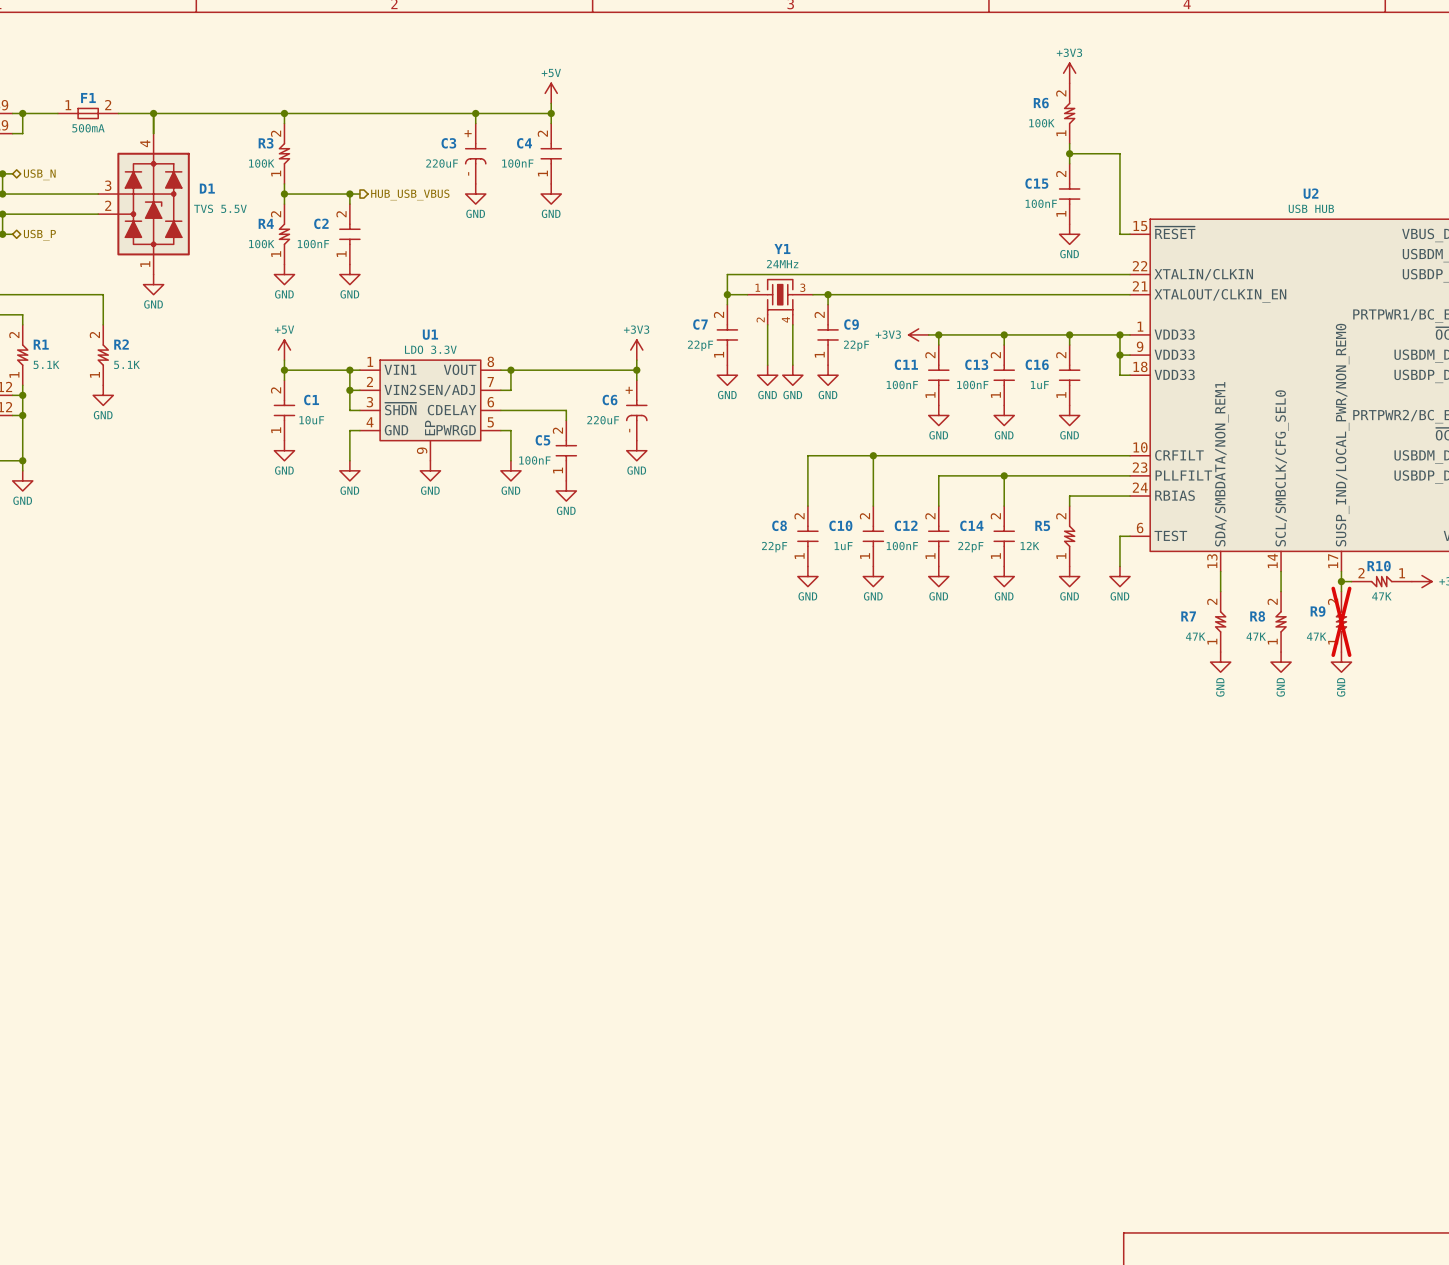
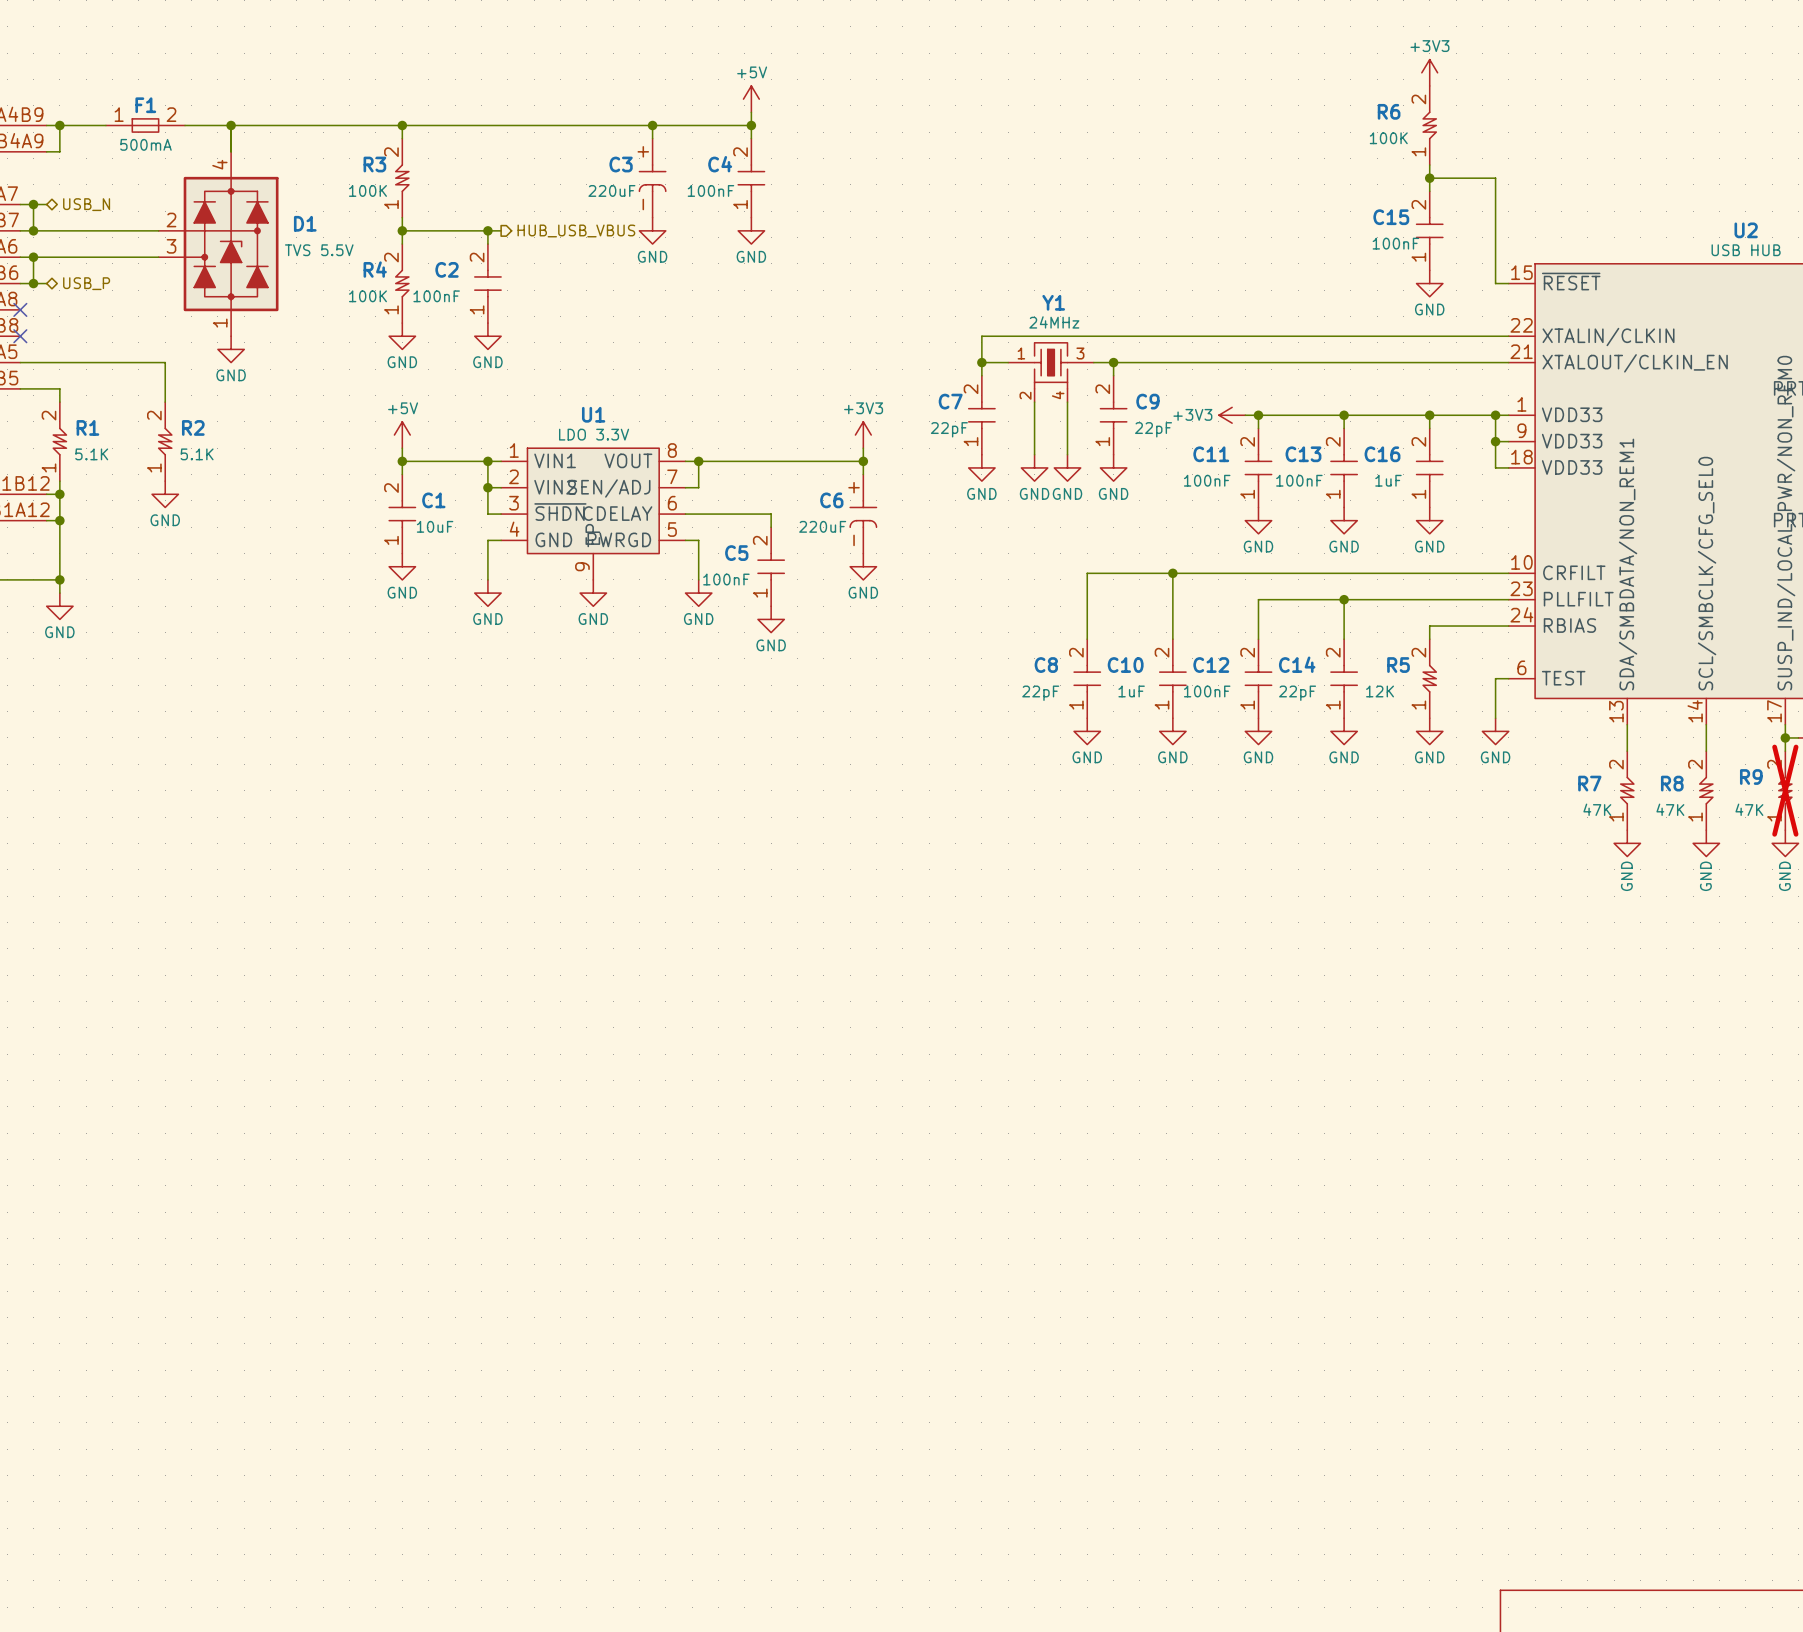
D1 pin number: 3 (108, 185) -> 2 (171, 220)
D1 pin number: 2 (108, 205) -> 3 (171, 246)

